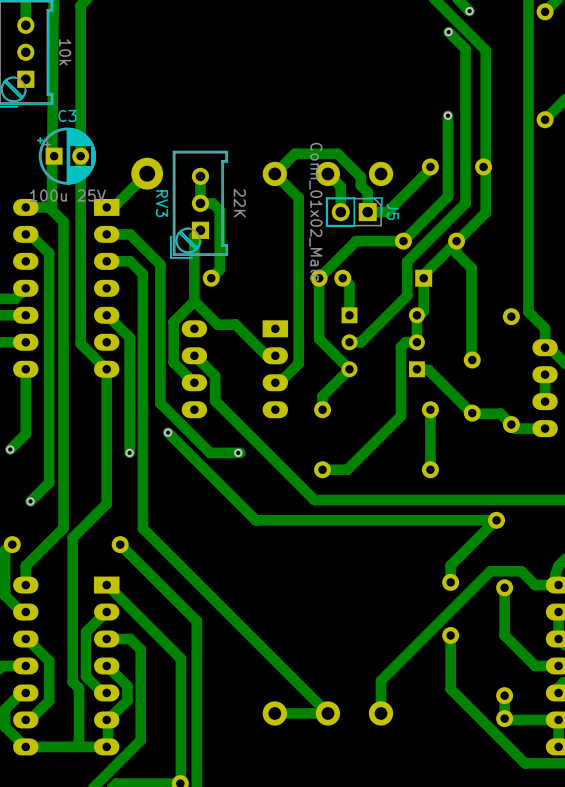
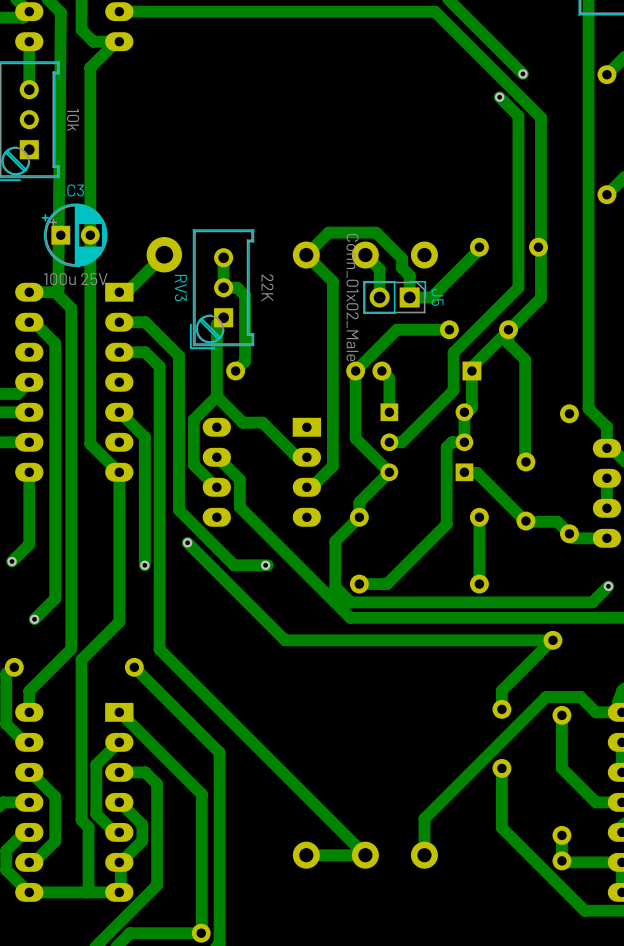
track: (447, 115) (447, 196) (403, 241) -> none
via: (447, 115) -> none
track: none -> (359, 517) (335, 541) (335, 587) (350, 602) (592, 602) (608, 586)
via: none -> (608, 586)

